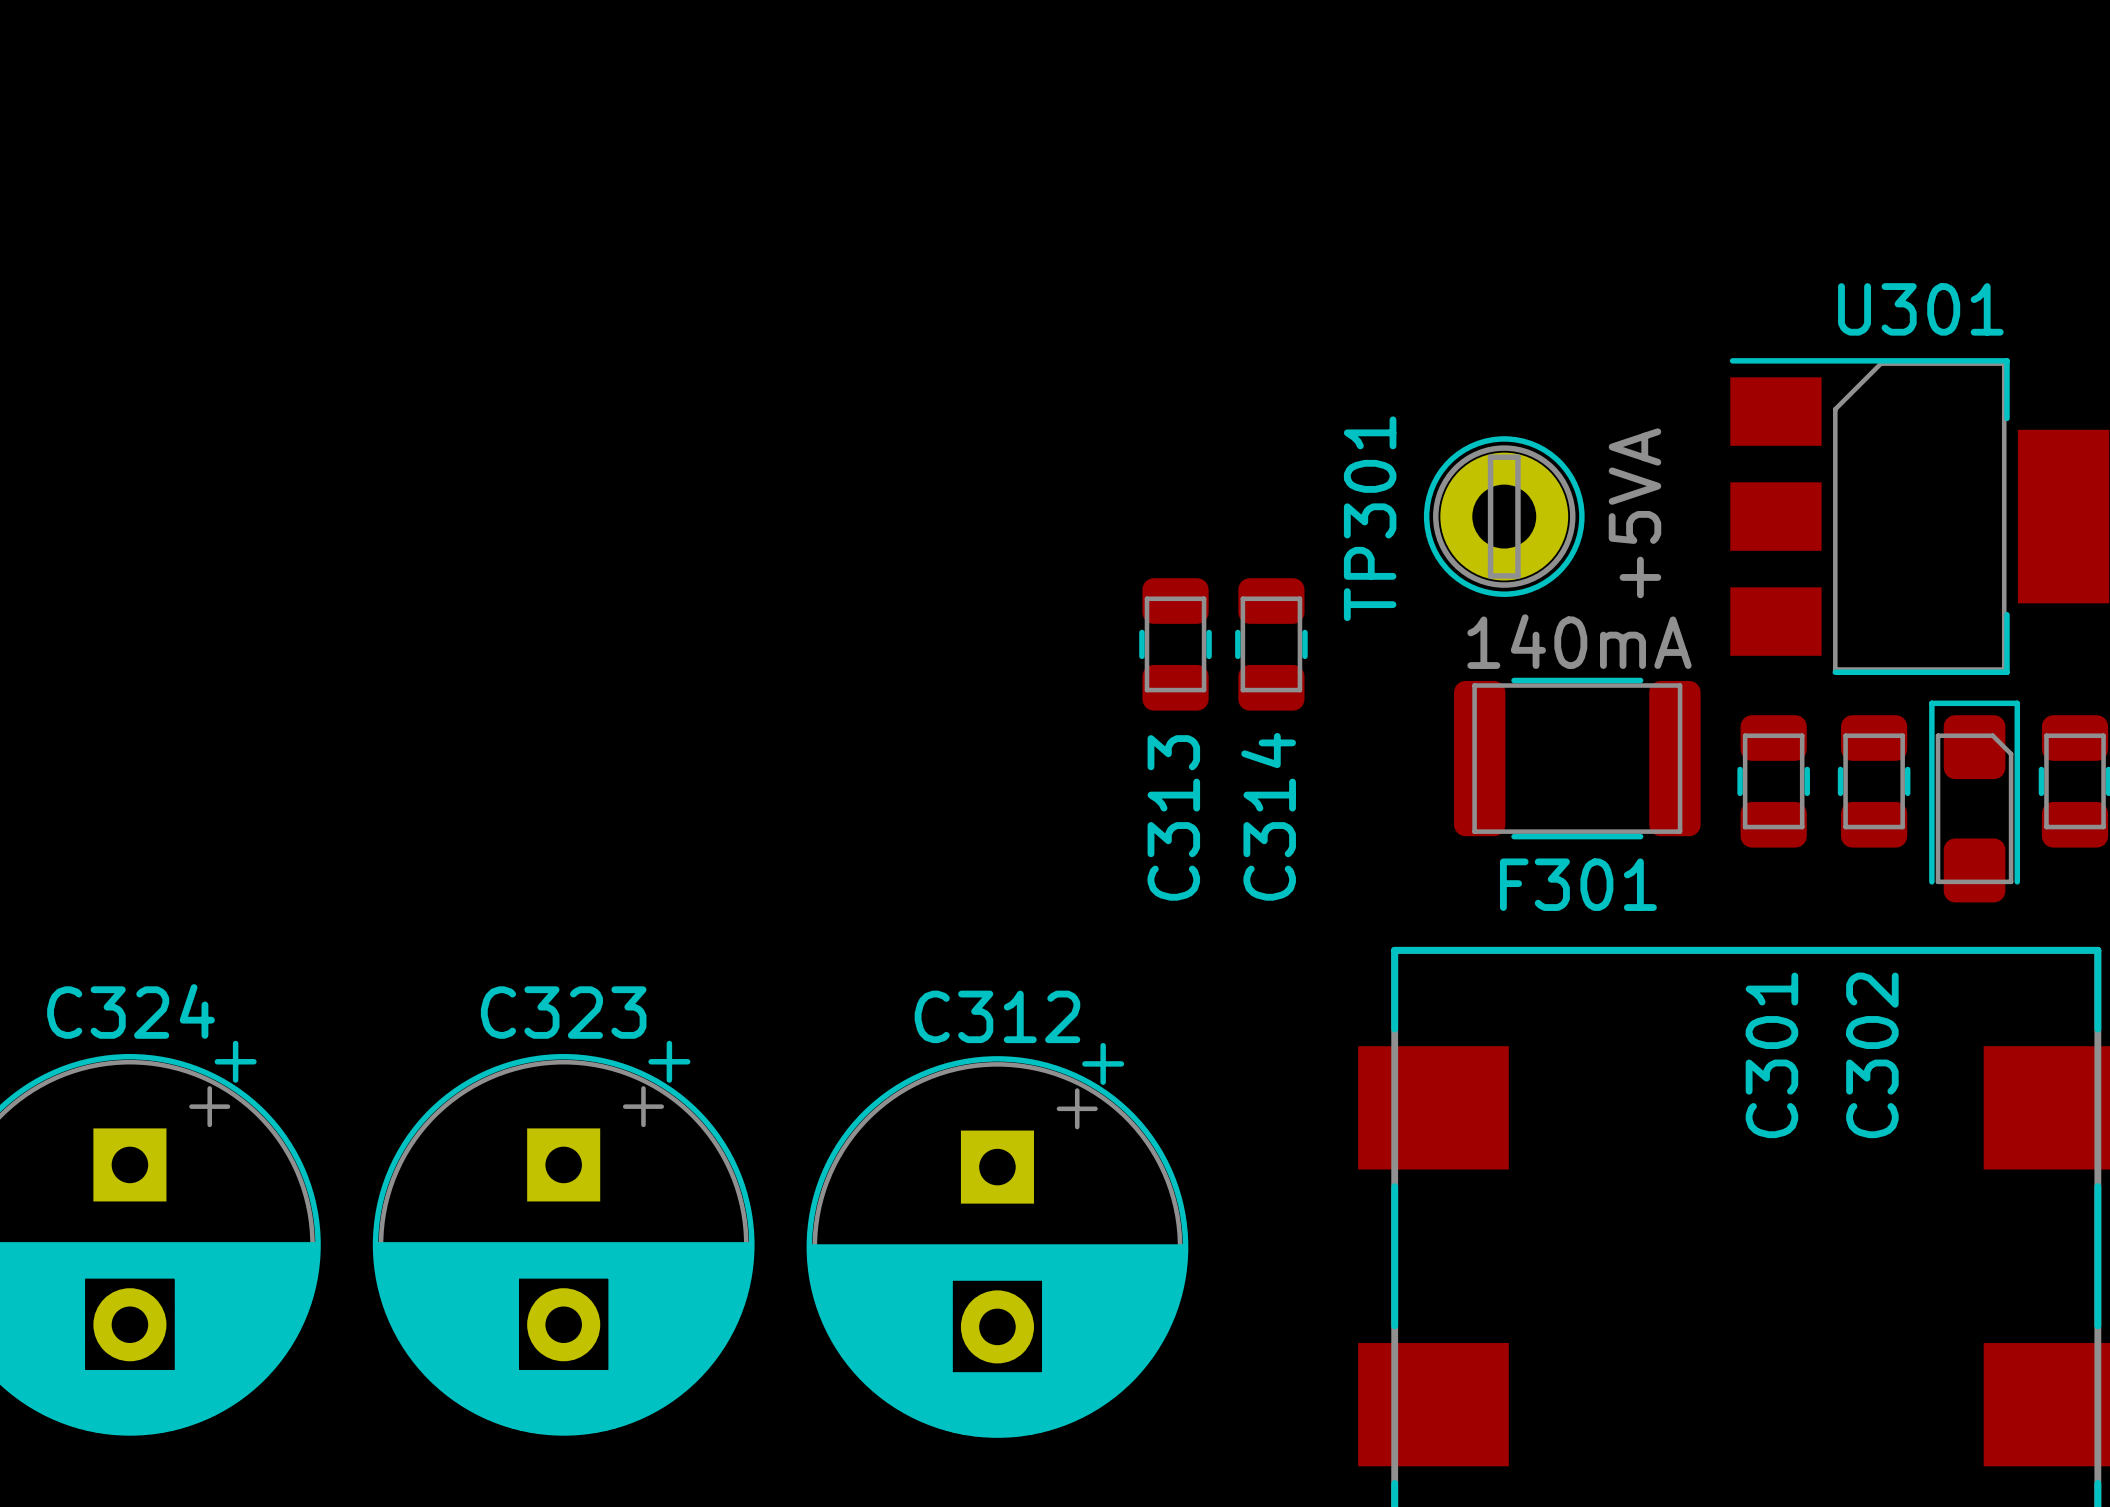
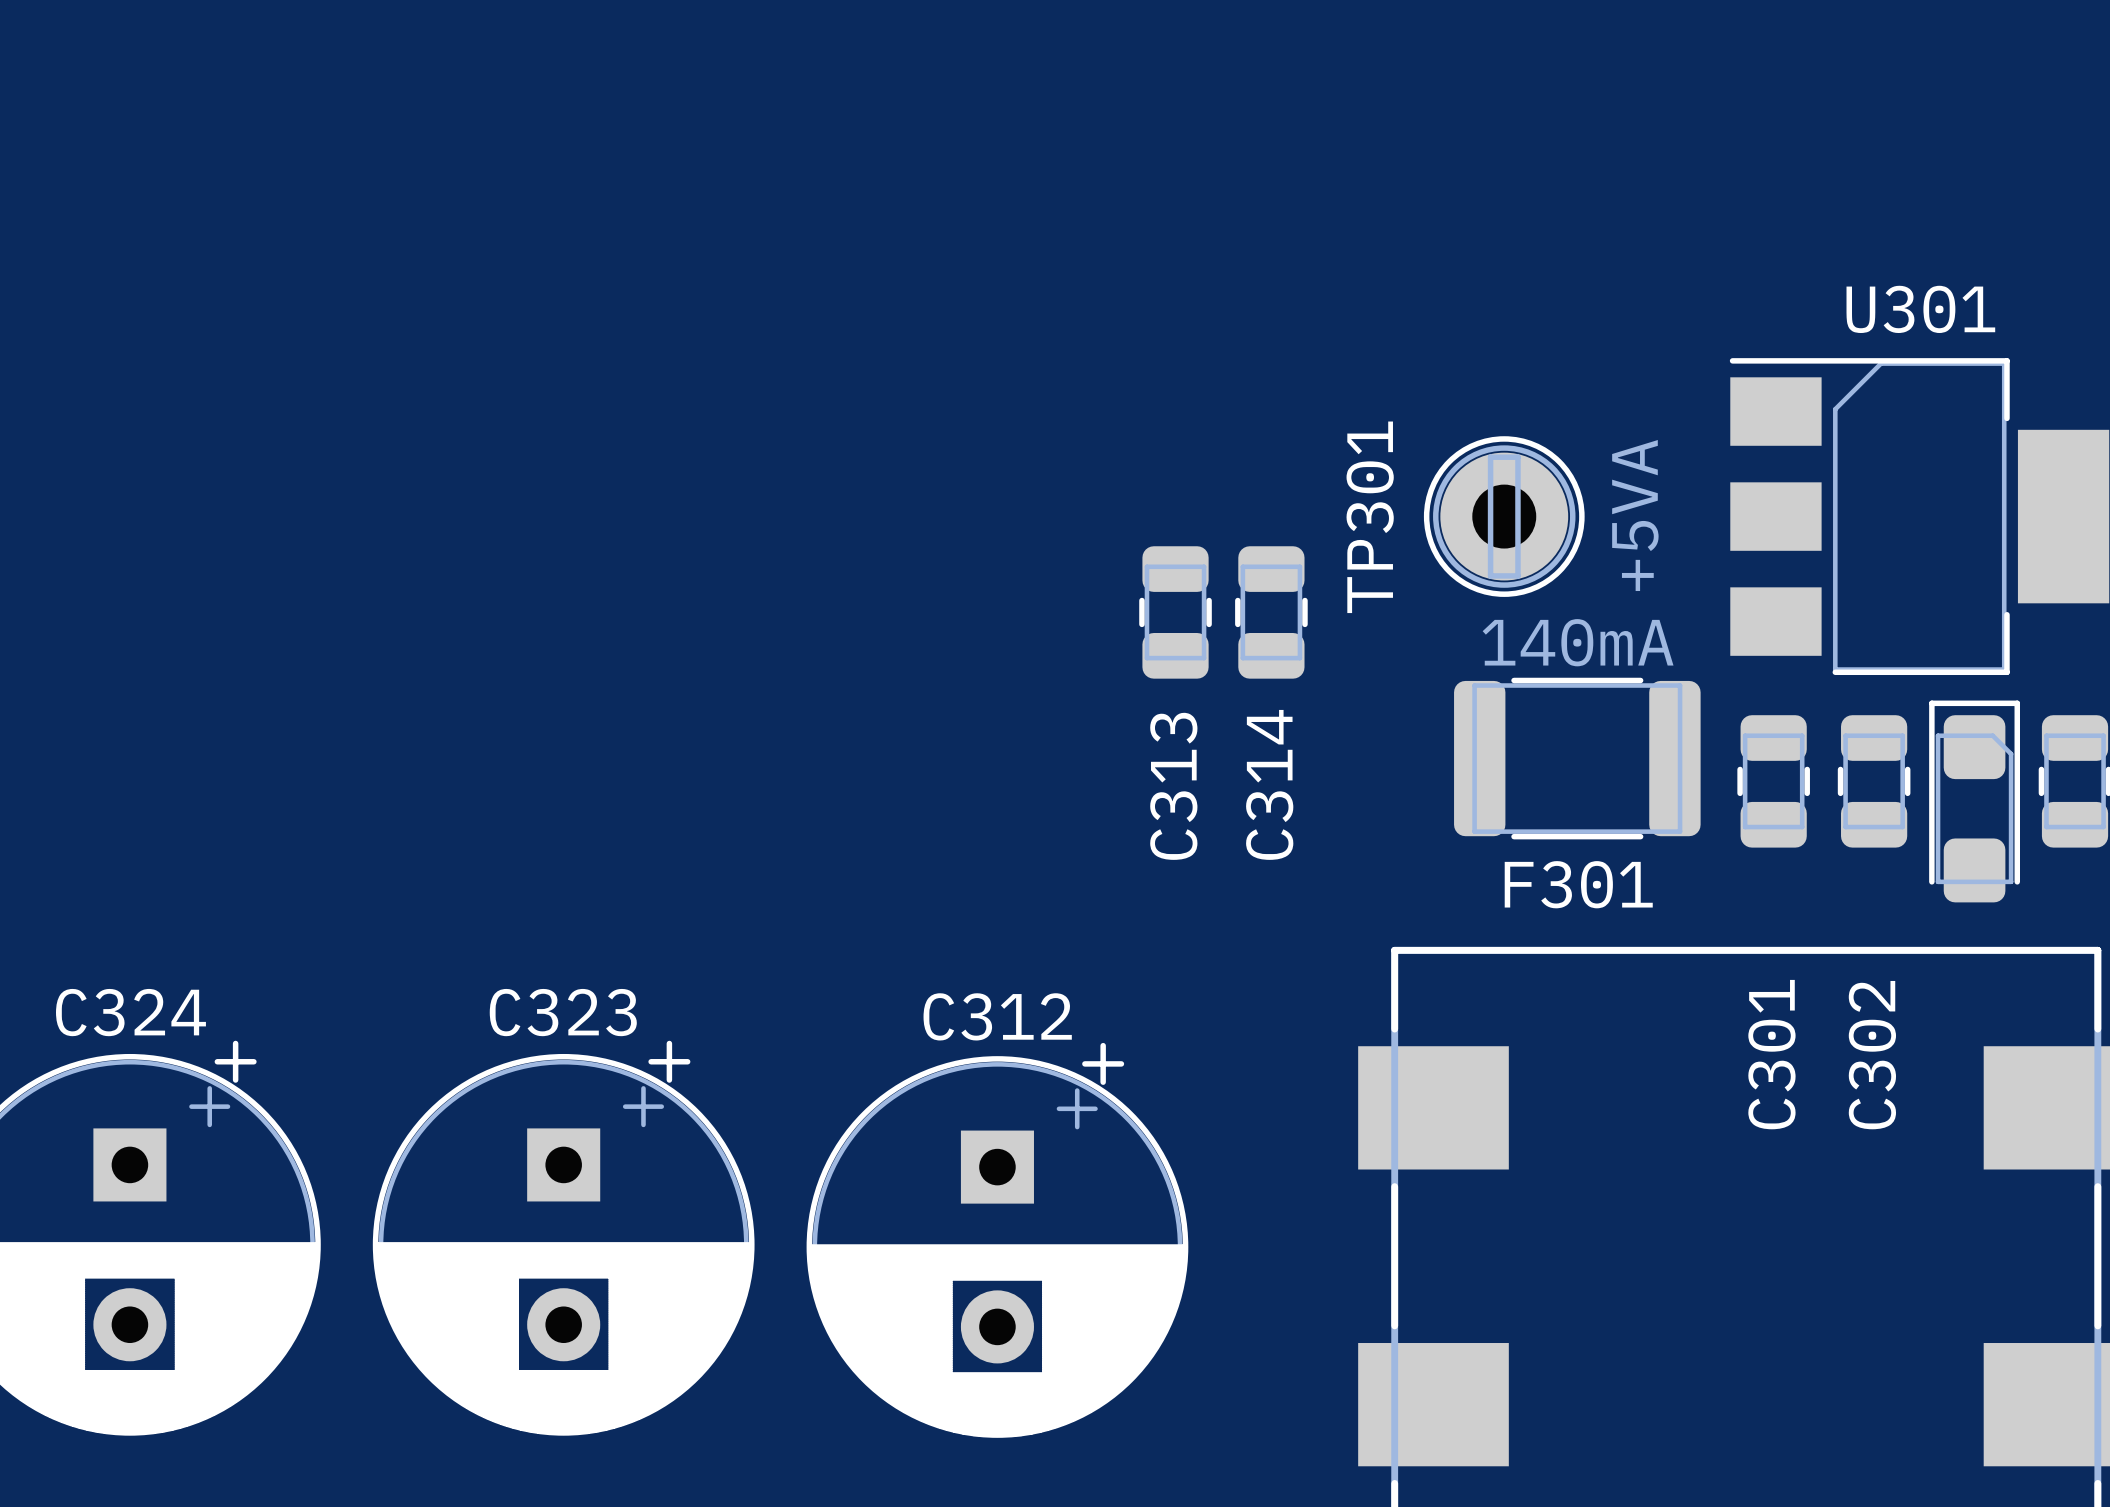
C313 position: (1175, 644) -> (1175, 612)
C314 position: (1271, 644) -> (1271, 612)

